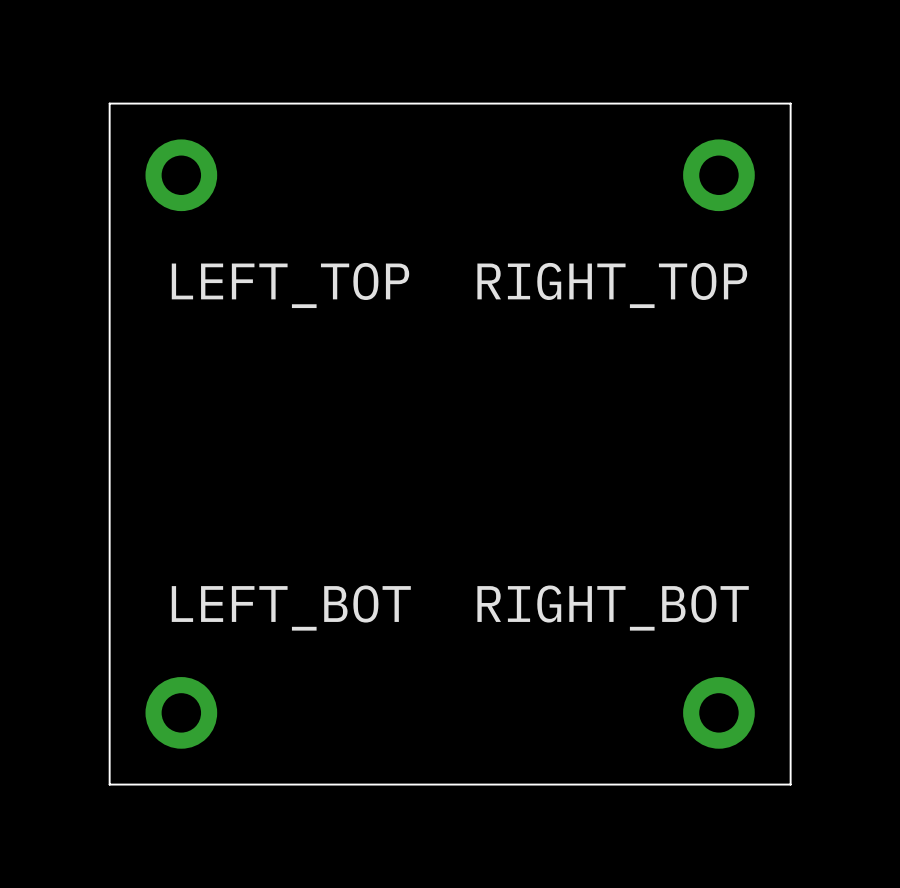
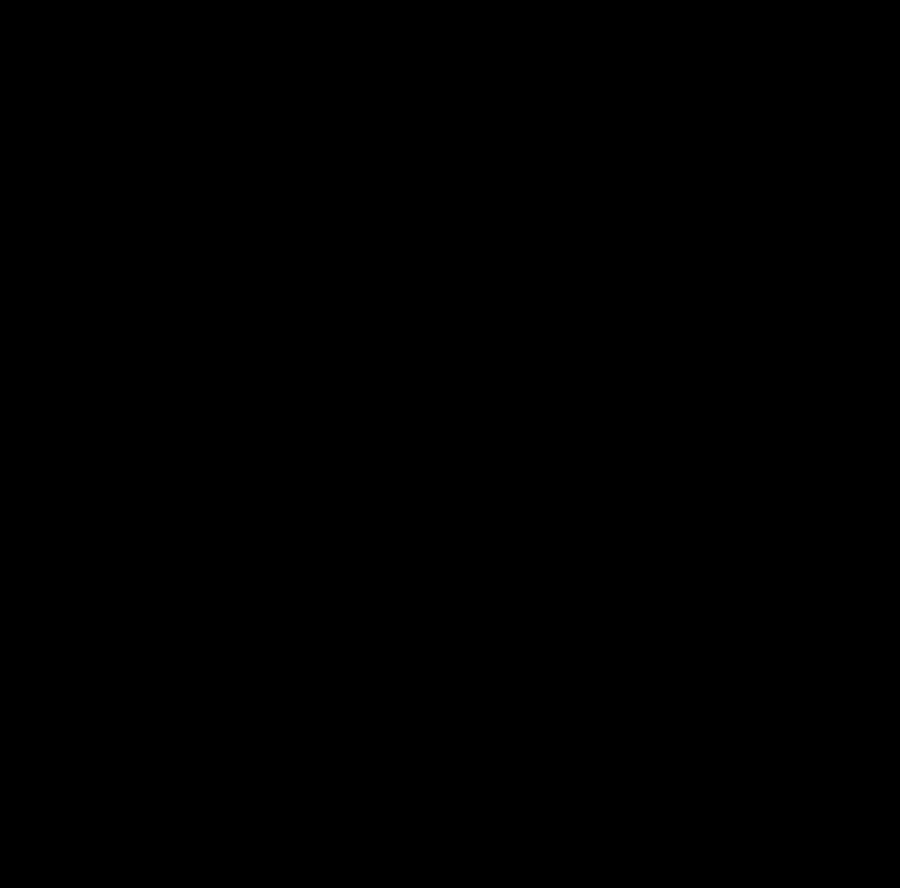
board edge: (109, 103) (790, 103) (790, 784) (109, 784) (109, 103) -> none
part: LEFT_TOP (181, 175) -> none
part: RIGHT_TOP (718, 175) -> none
part: LEFT_BOT (181, 712) -> none
part: RIGHT_BOT (718, 712) -> none

